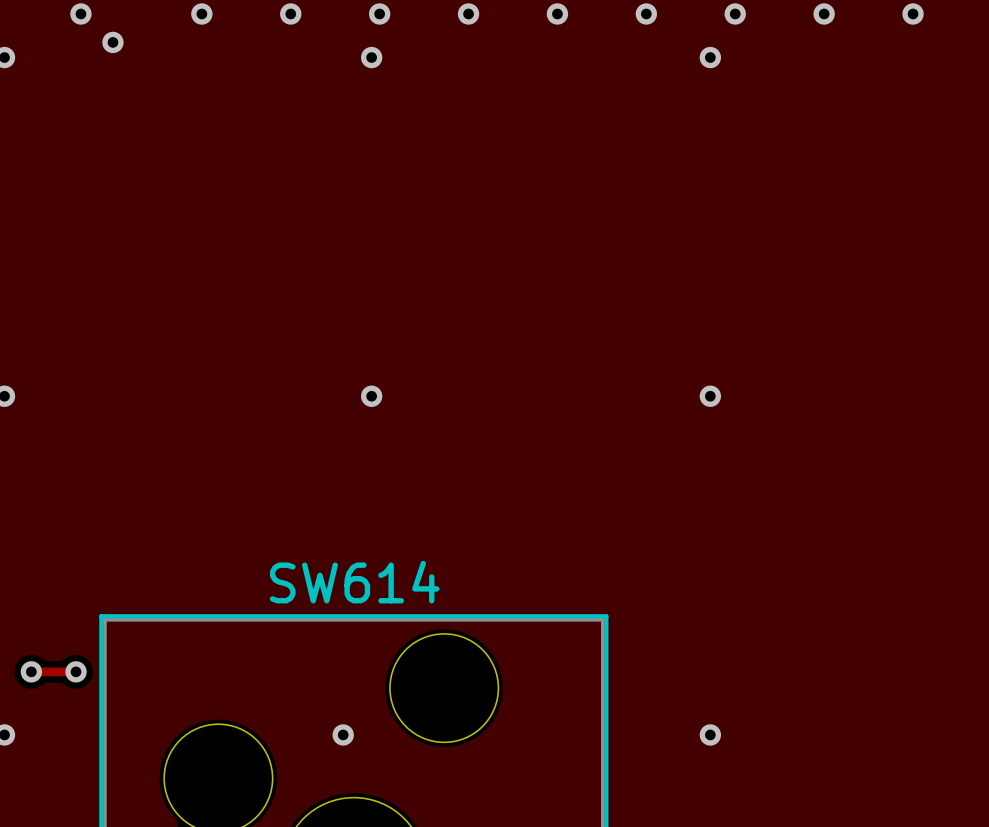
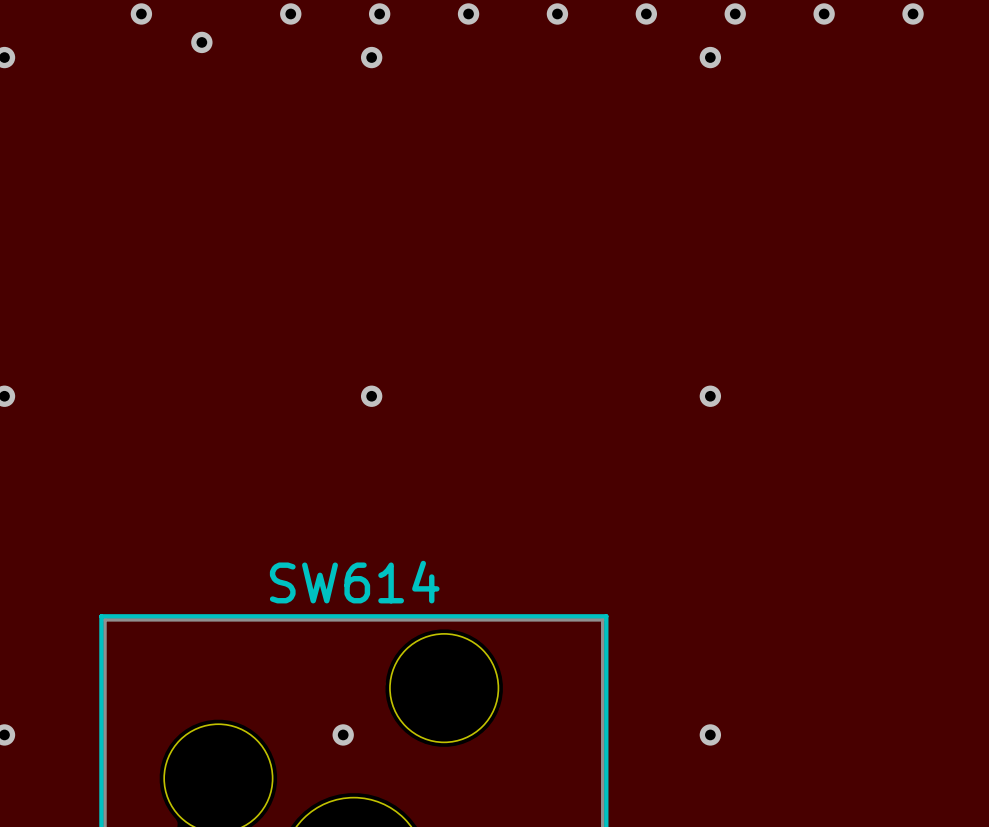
via: (80, 13) -> none
via: none -> (141, 13)
via: (201, 13) -> none
via: (112, 42) -> none
via: none -> (201, 42)
track: (31, 671) (76, 671) -> none
via: (31, 671) -> none
via: (76, 671) -> none

